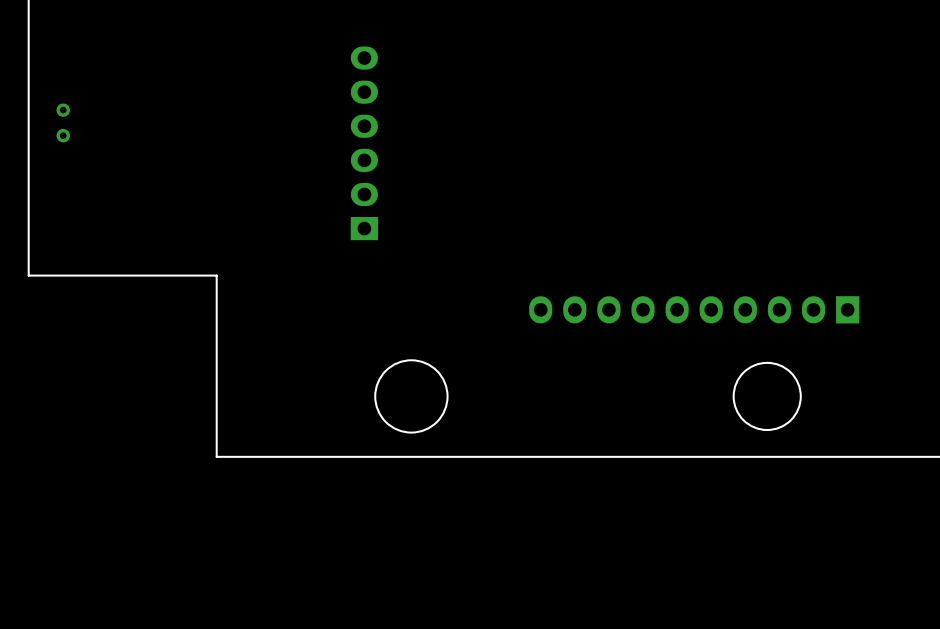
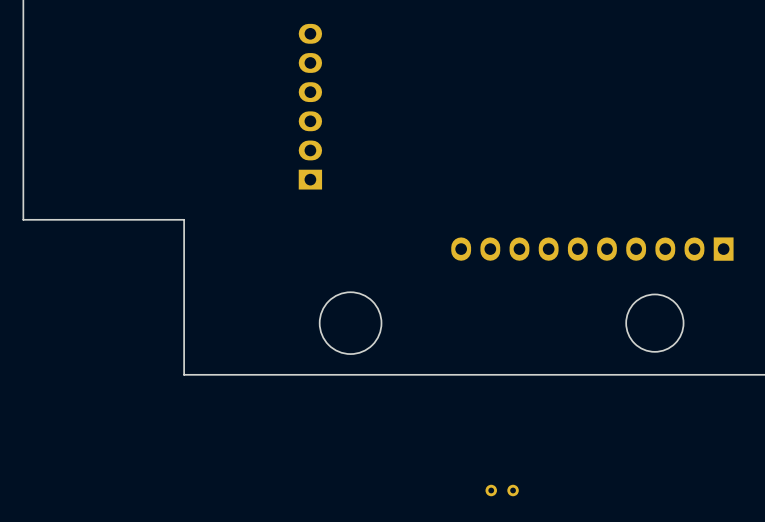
part: (63, 122) -> none
part: none -> (502, 490)

